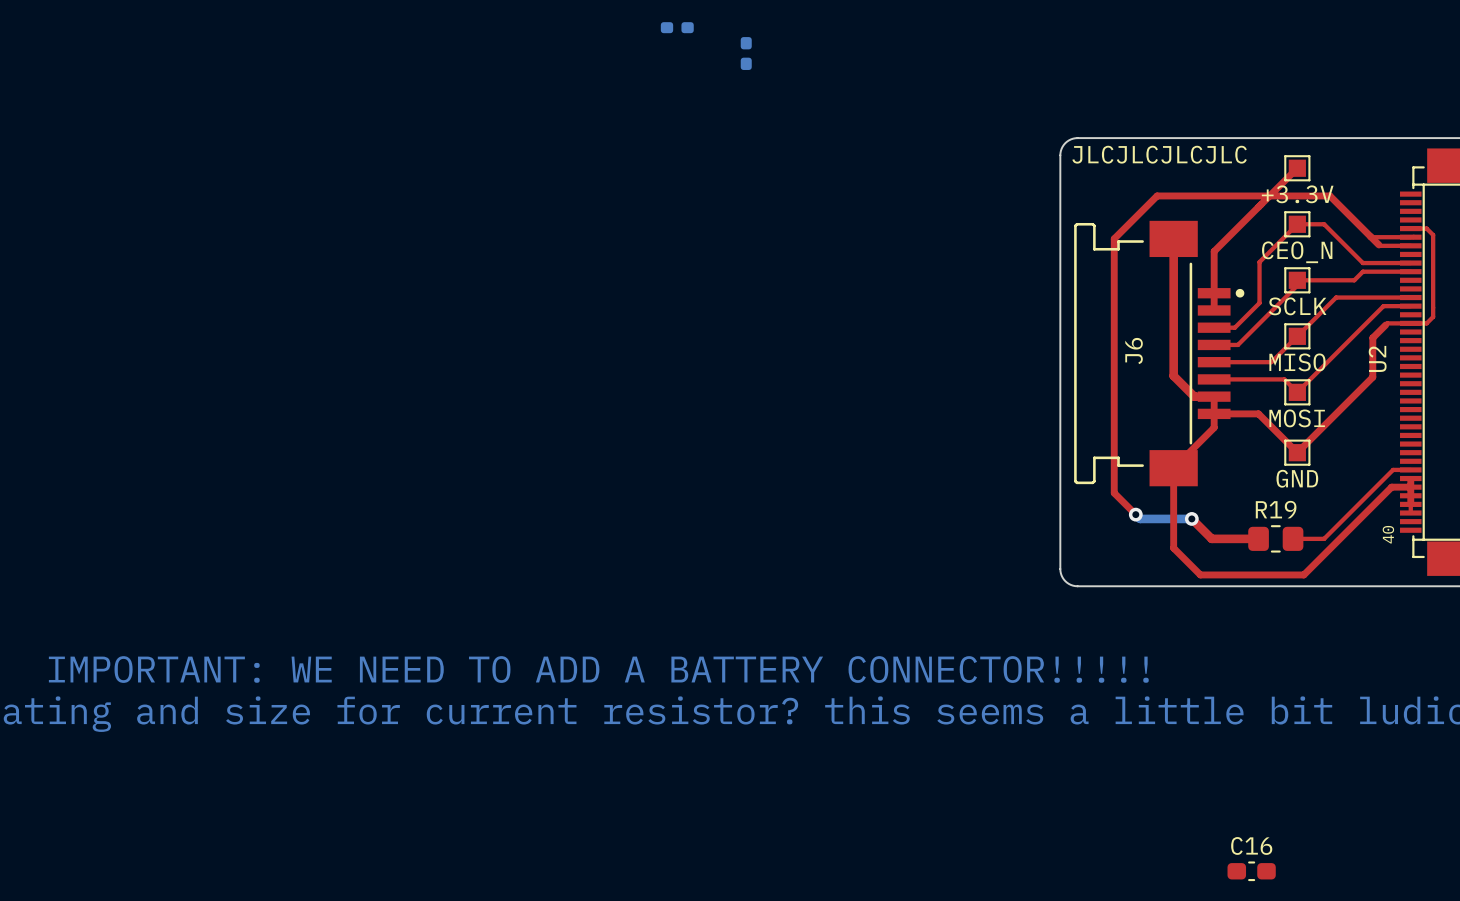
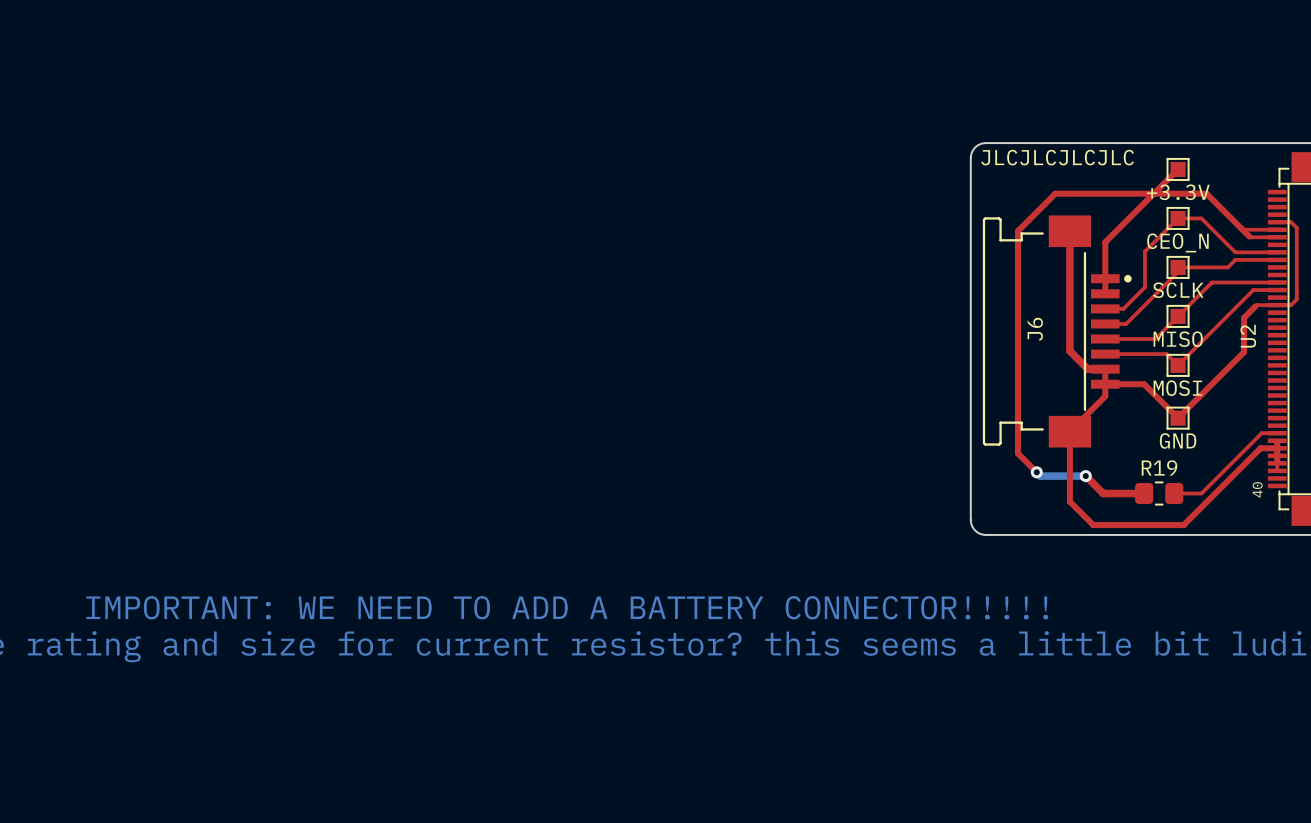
part: (677, 27) -> none
part: (746, 53) -> none
C16: (1251, 871) -> none

